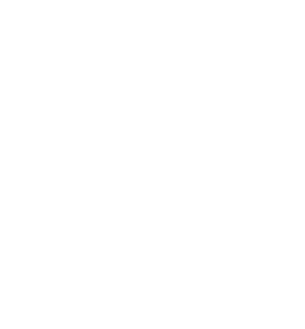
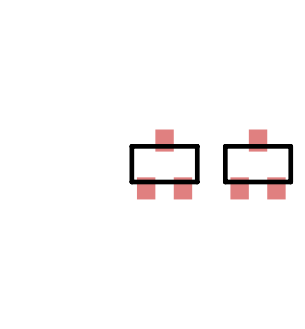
part: none -> (164, 164)
part: none -> (258, 164)

